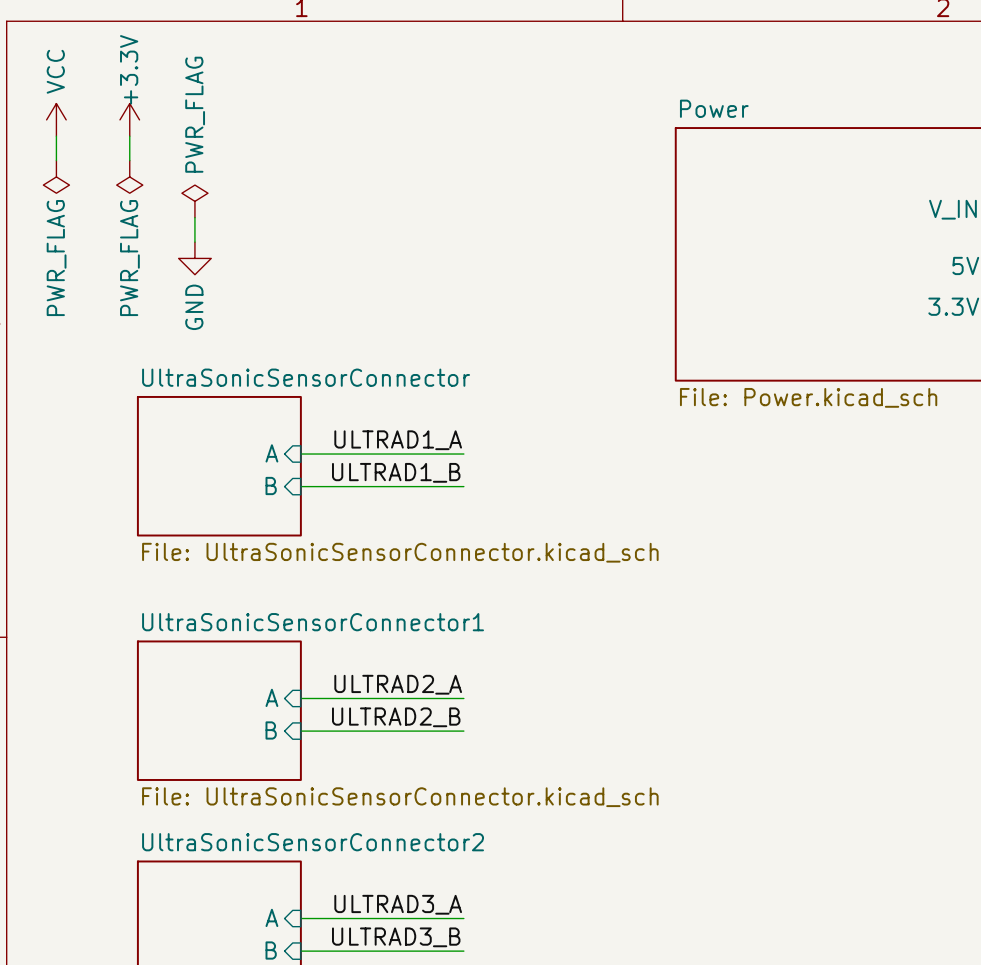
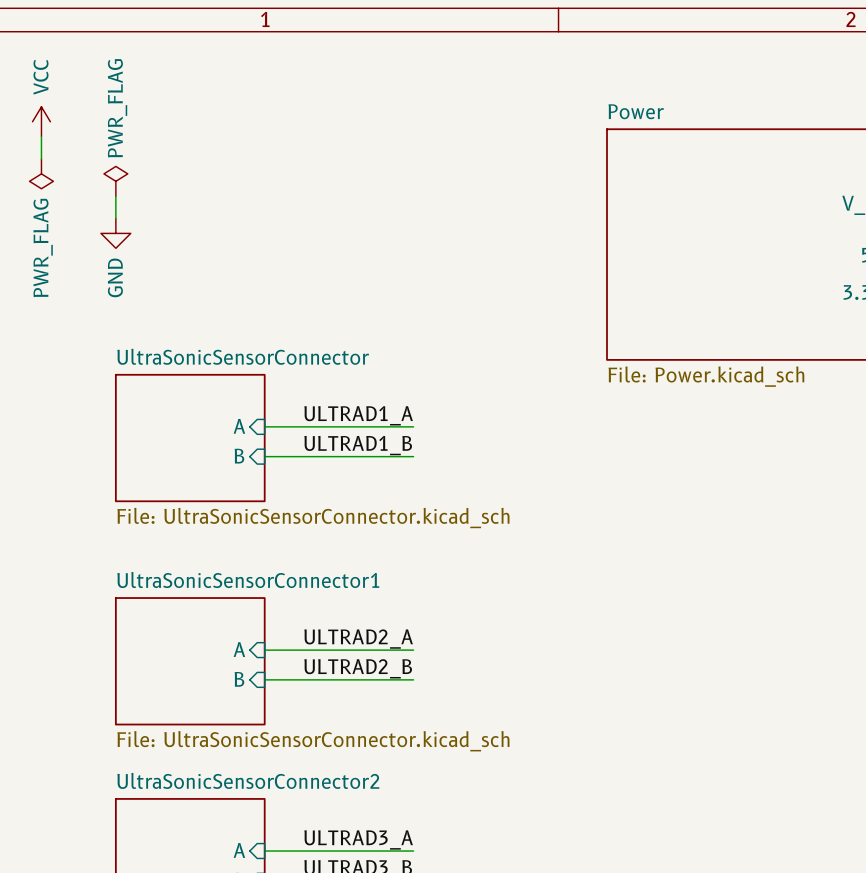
power symbol: +3.3V (129, 119) -> none
wire: (129, 136) (129, 160) -> none
power symbol rotation: 0° (129, 176) -> 180° (115, 181)
power symbol: PWR_FLAG (194, 201) -> none
wire: (194, 217) (194, 242) -> (115, 196) (115, 218)
power symbol position: GND (194, 258) -> GND (115, 233)

